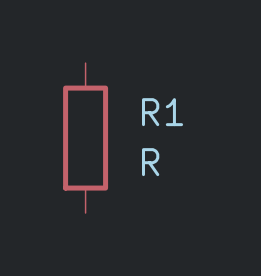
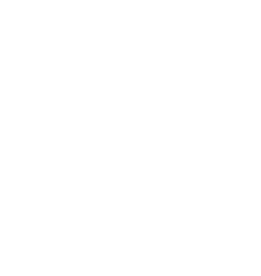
R1: R (85, 138) -> none

